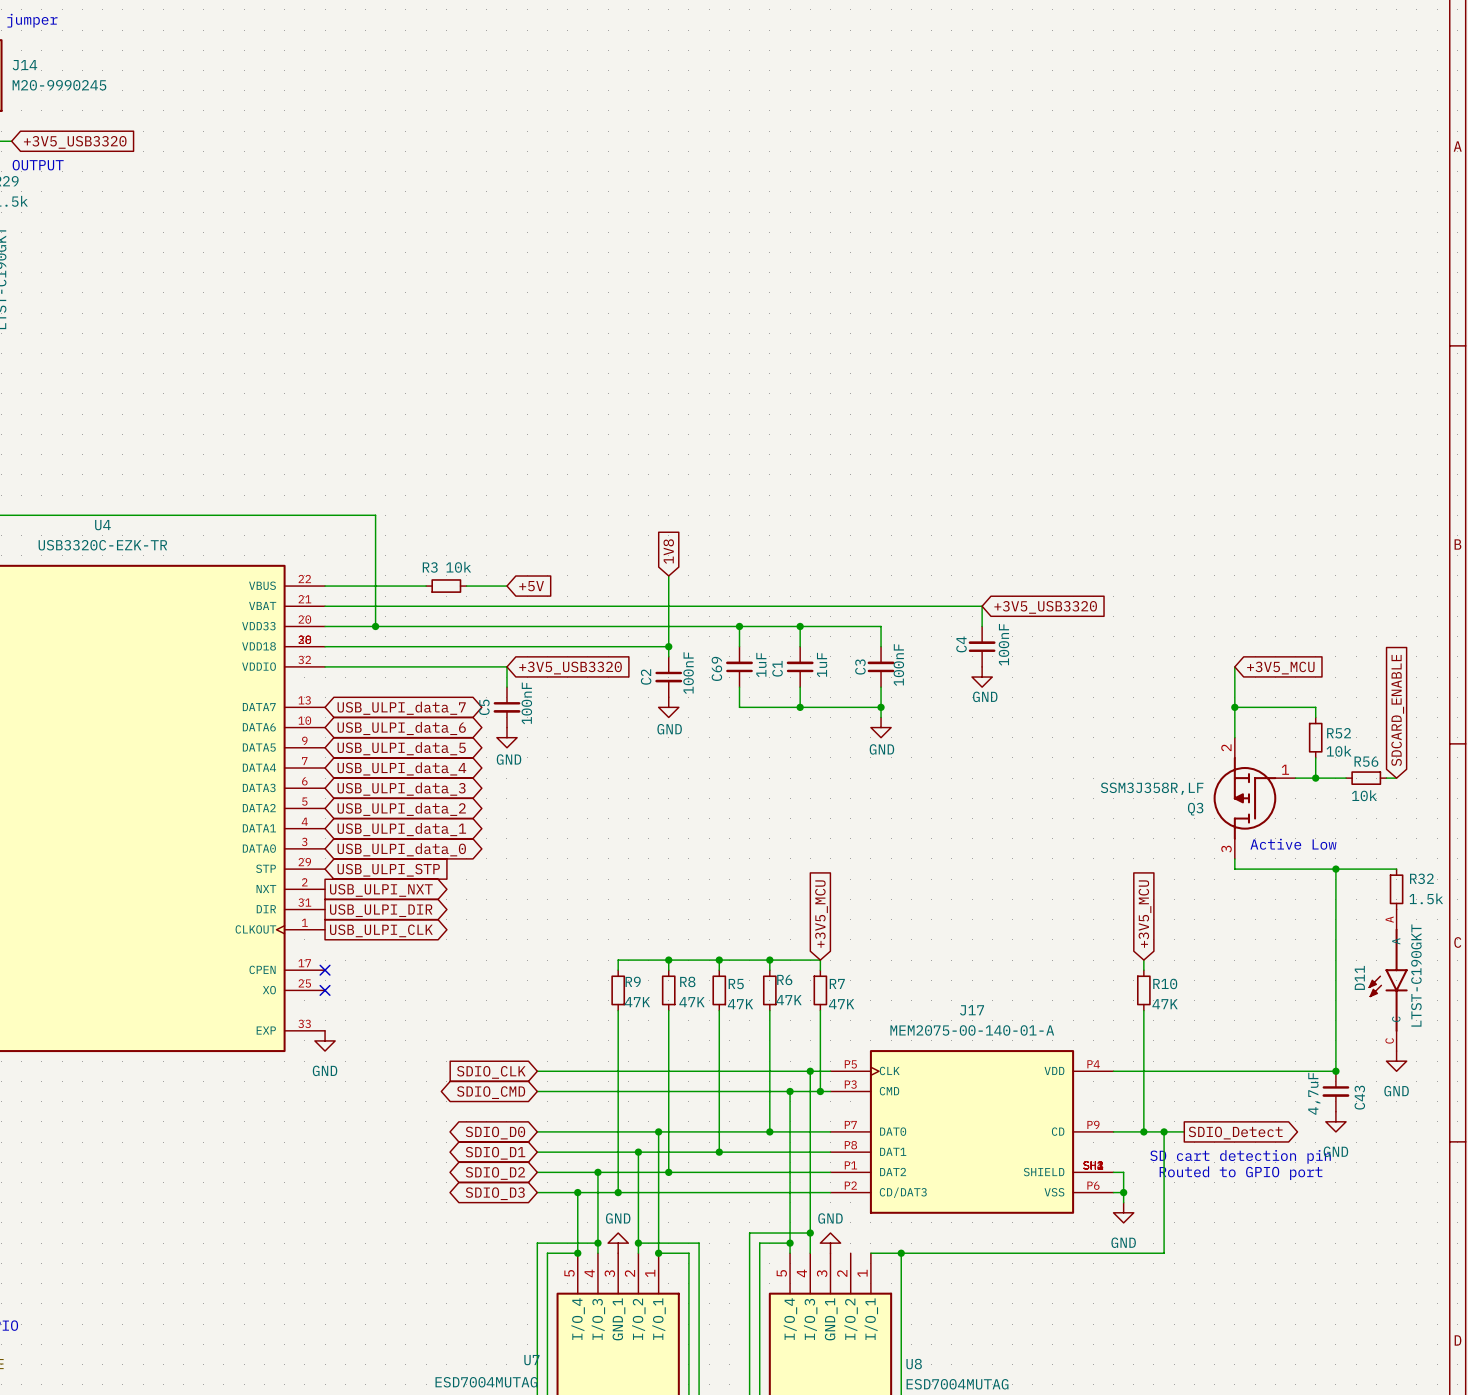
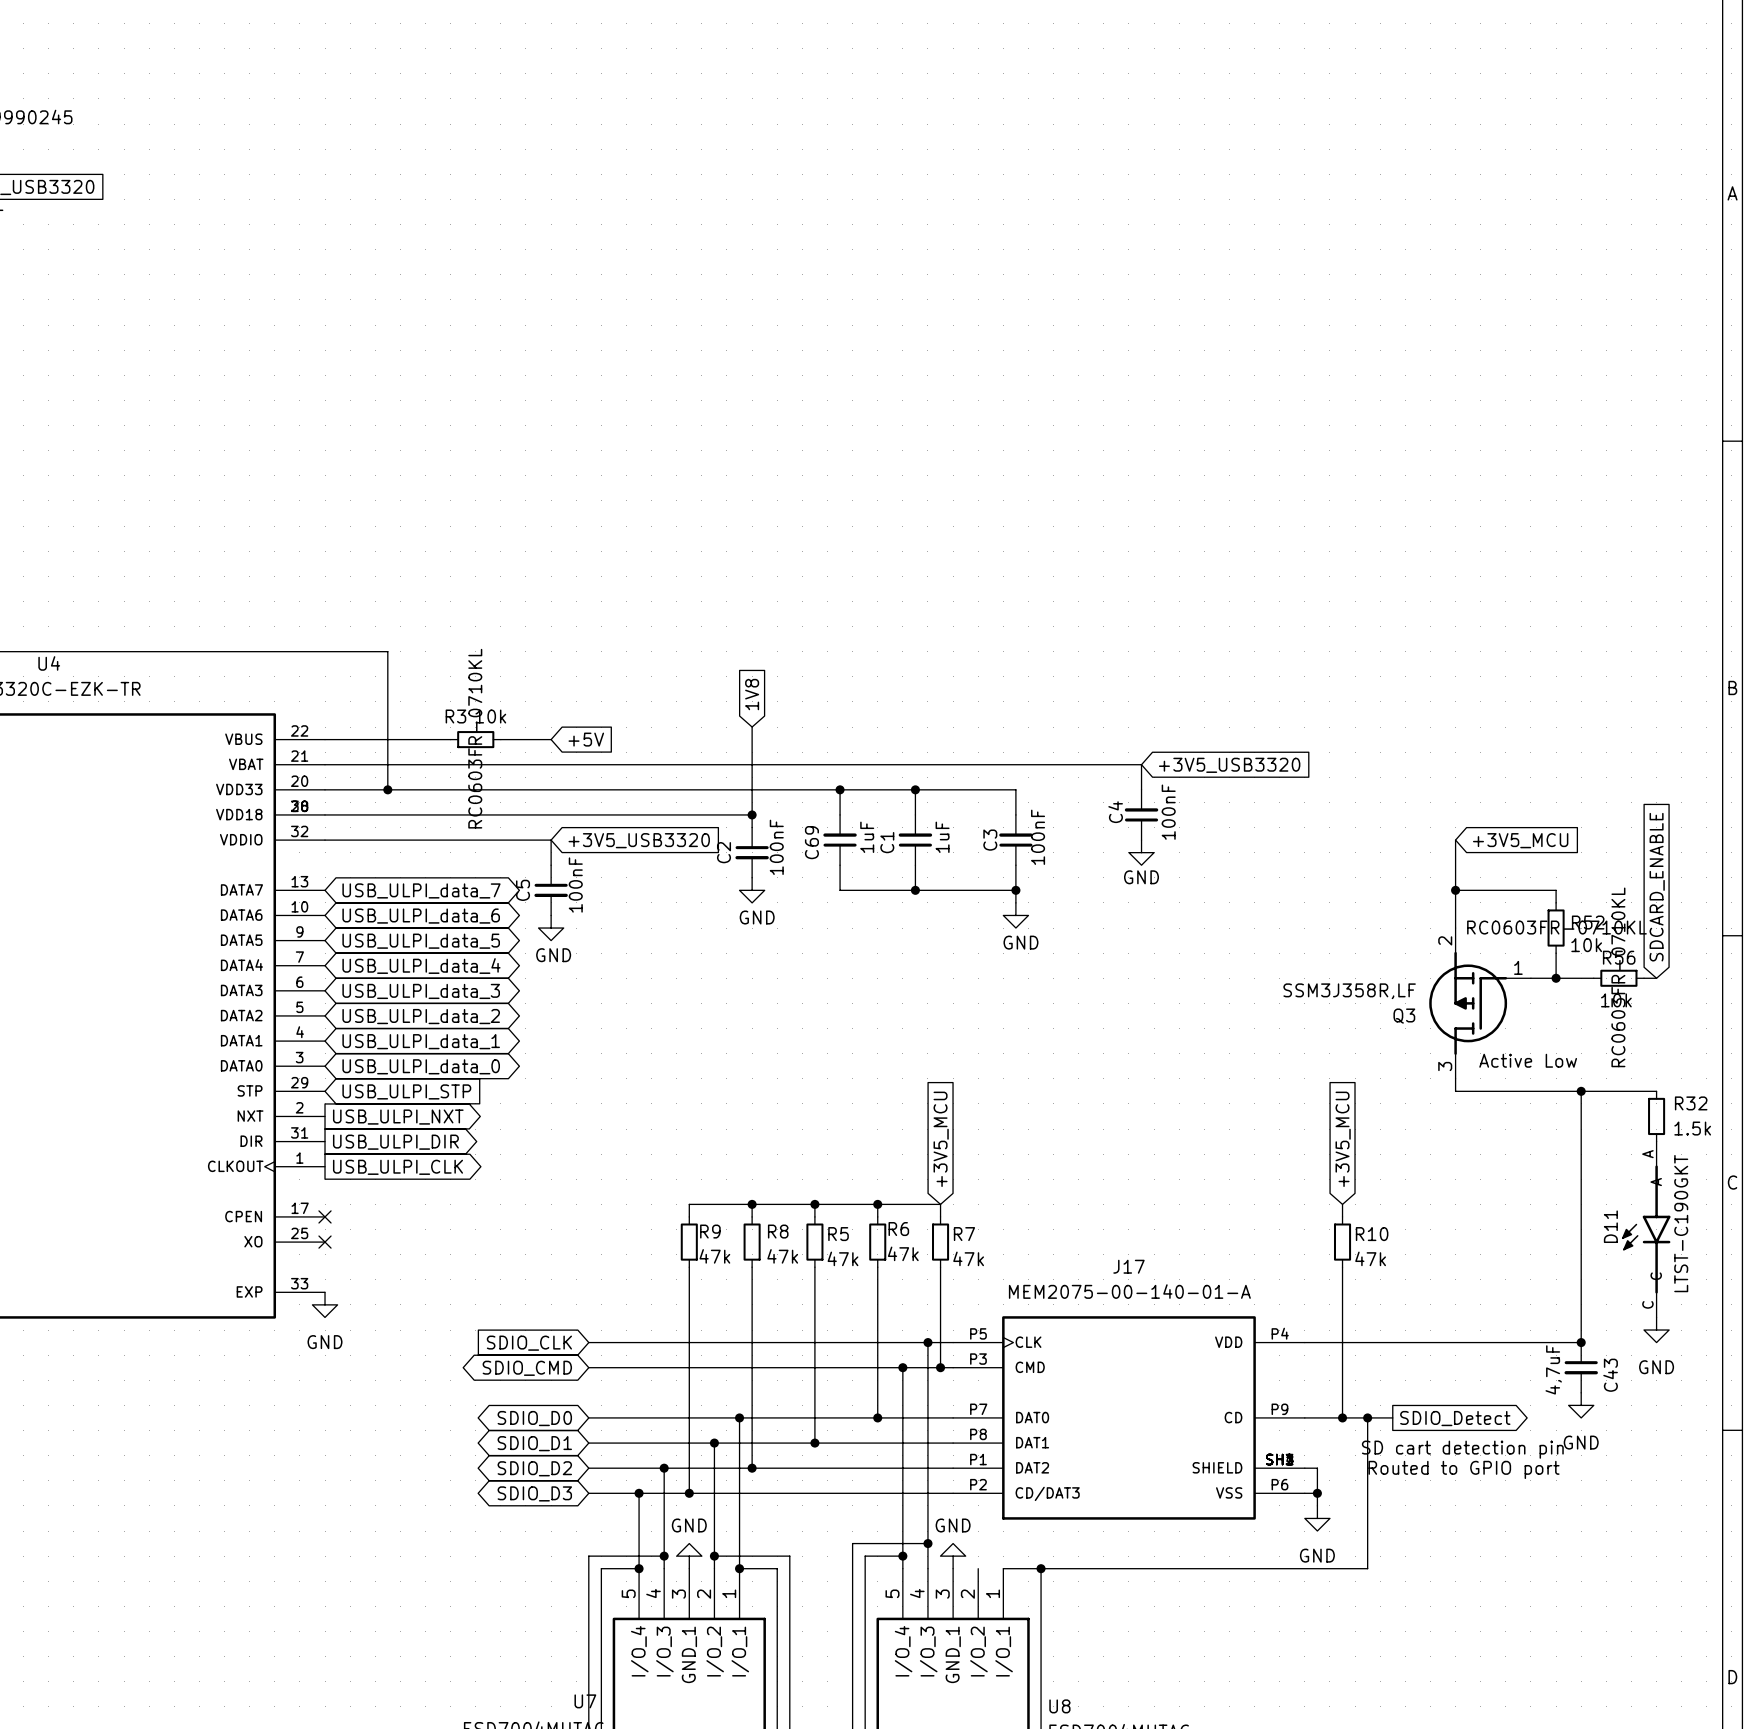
R3 text: none -> RC0603FR-0710KL (475, 738)
R52 text: none -> RC0603FR-0710KL (1556, 927)
R56 text: none -> RC0603FR-0710KL (1618, 977)
R6 value: 47K (789, 1000) -> 47k (903, 1253)
R9 value: 47K (637, 1002) -> 47k (714, 1256)
R8 value: 47K (691, 1002) -> 47k (782, 1256)
R5 value: 47K (740, 1004) -> 47k (843, 1258)
R7 value: 47K (841, 1004) -> 47k (968, 1258)
R10 value: 47K (1165, 1004) -> 47k (1370, 1258)

